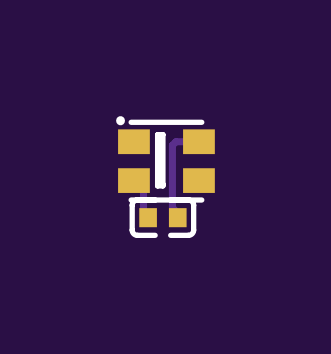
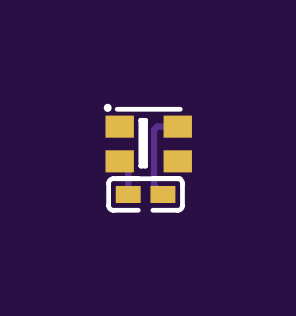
part footprint: [129, 197, 197, 238] -> [106, 176, 185, 213]

